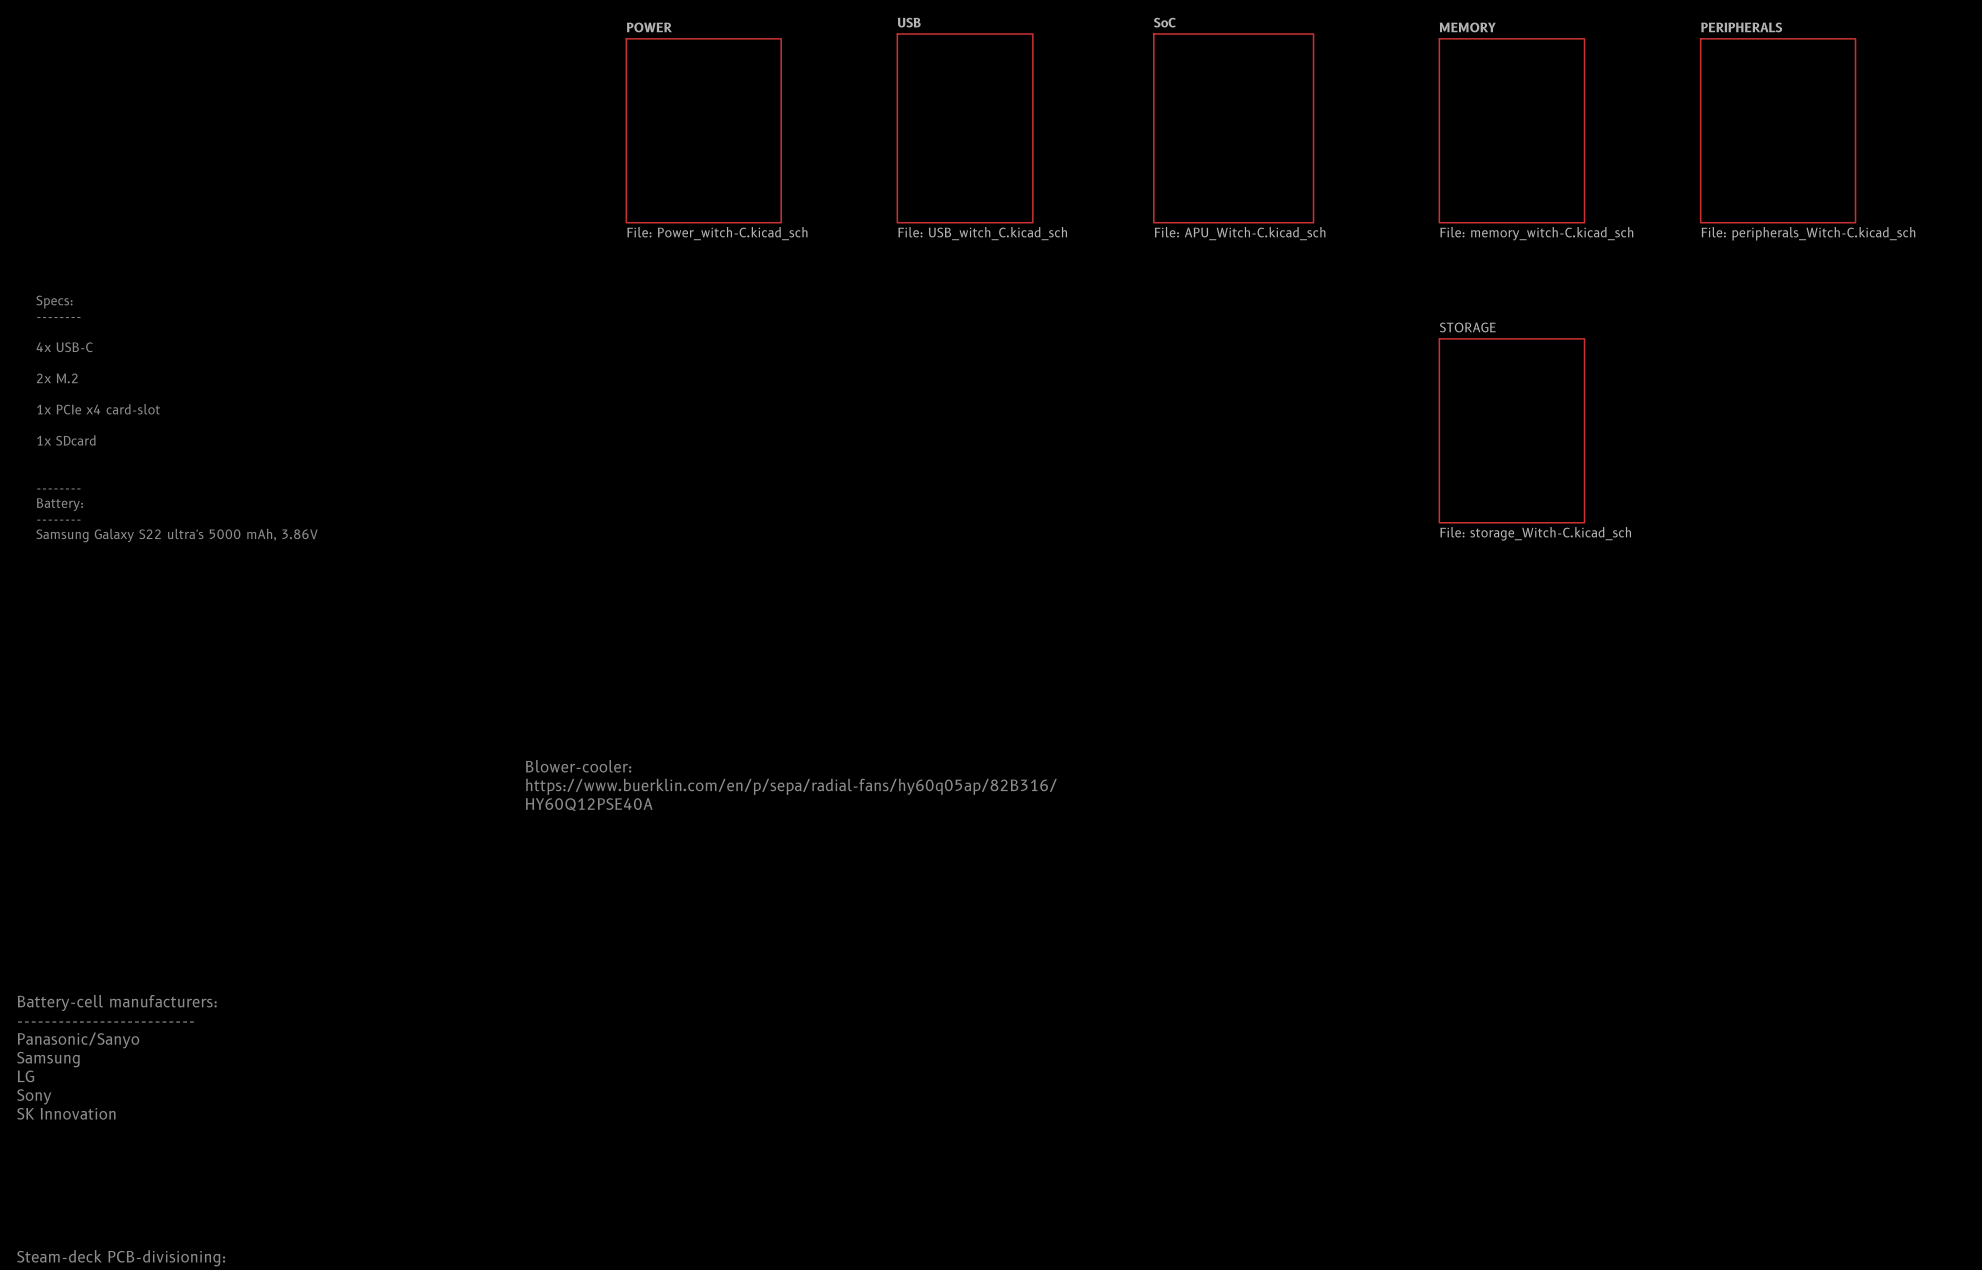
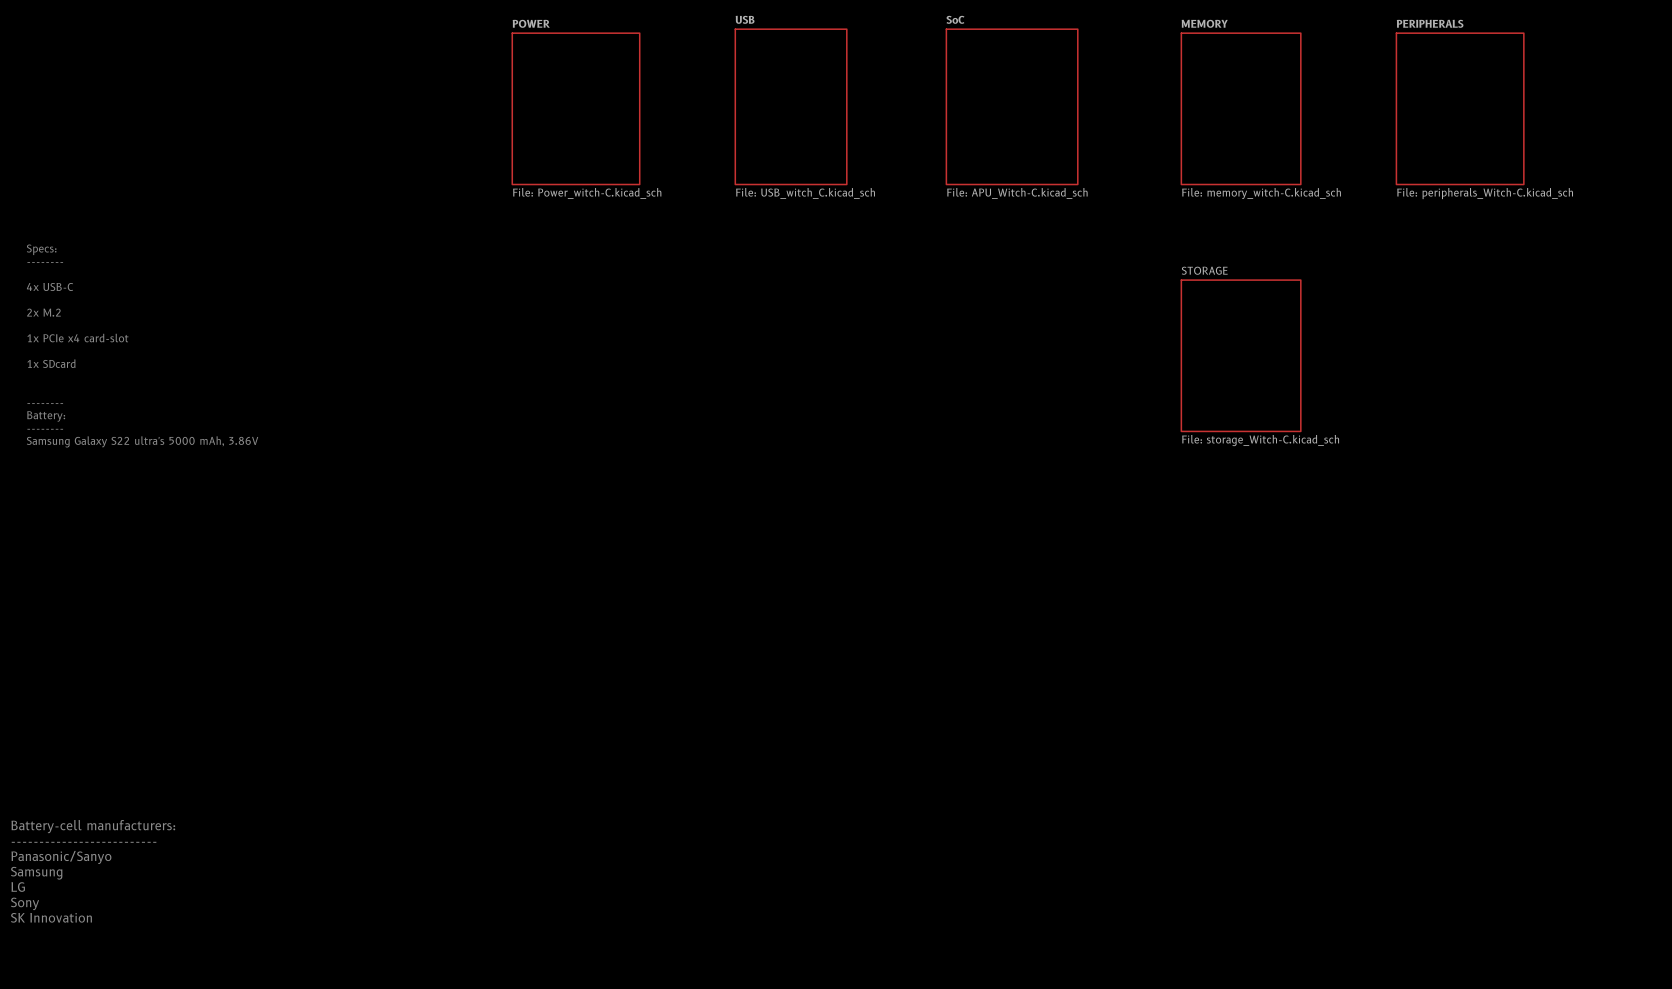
text: Blower-cooler: (578, 766) -> none
text: https://www.buerklin.com/en/p/sepa/radial-fans/hy60q05ap/82B316/ (791, 786) -> none
text: HY60Q12PSE40A (589, 804) -> none

